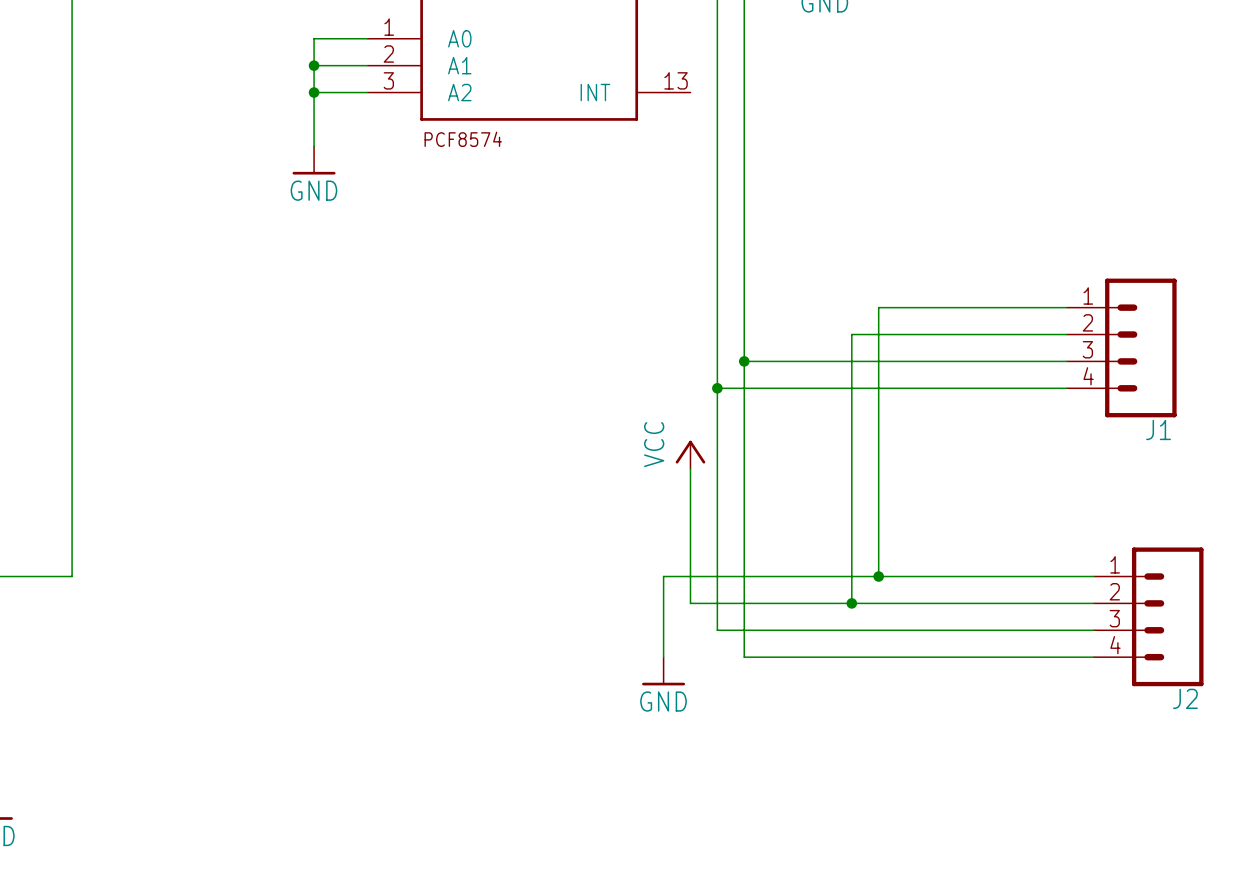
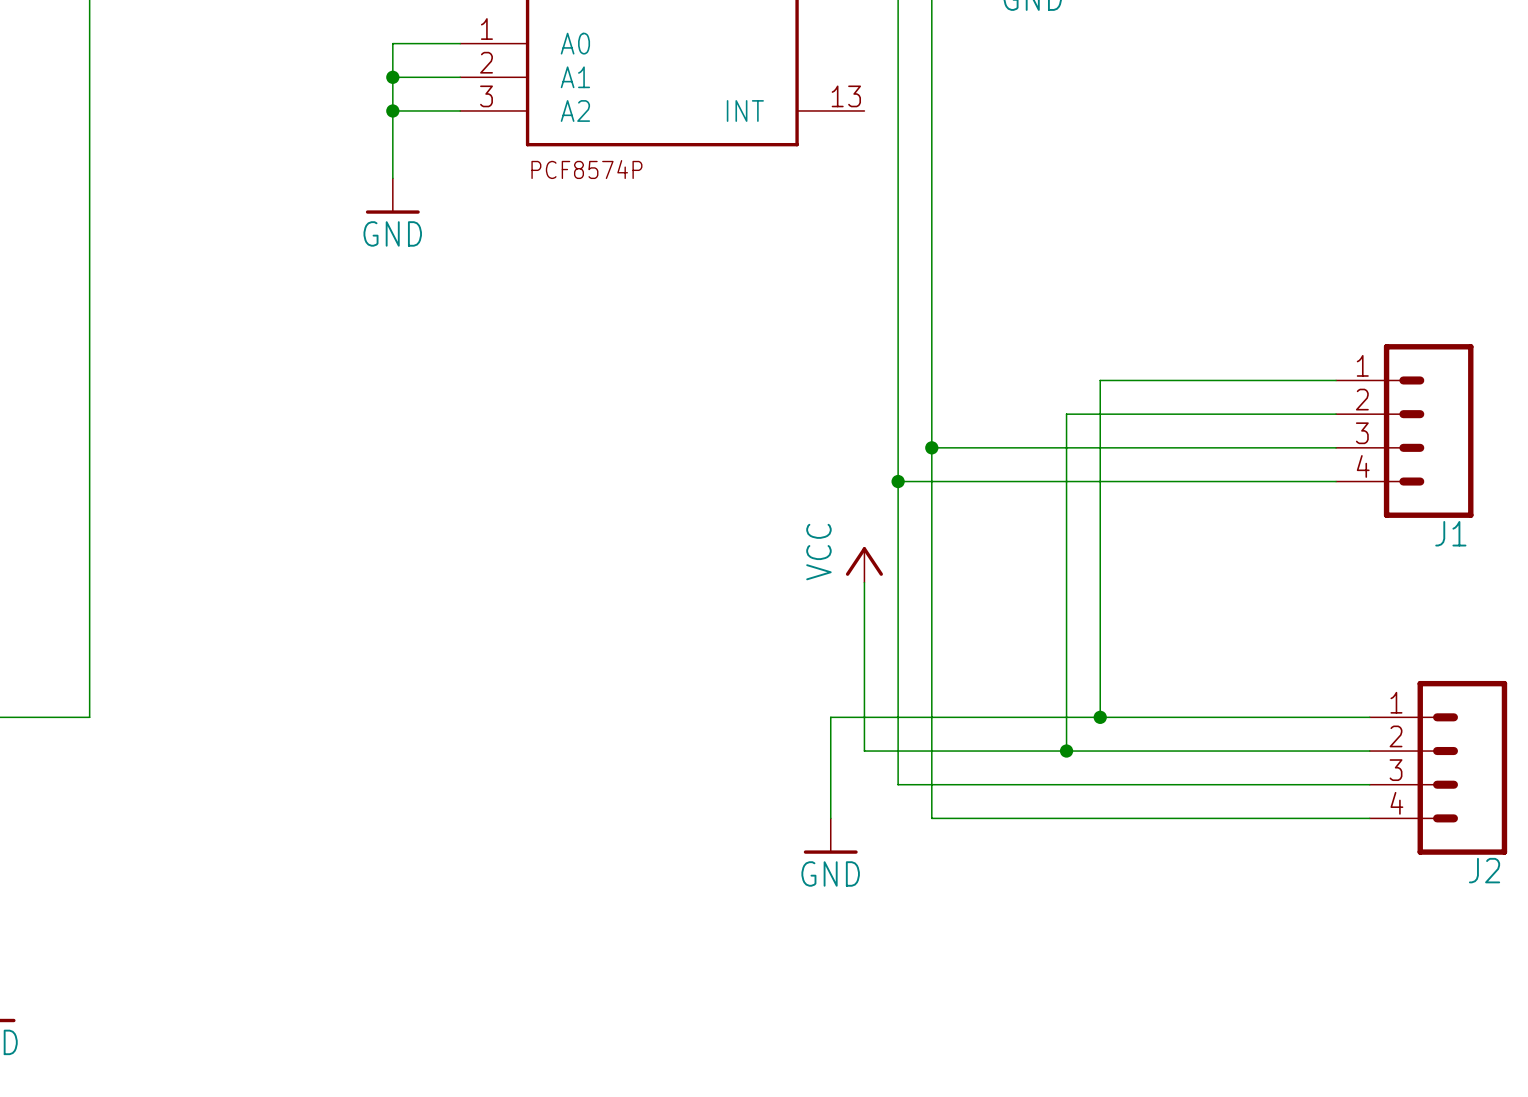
part value: PCF8574 (463, 139) -> PCF8574P (586, 169)

